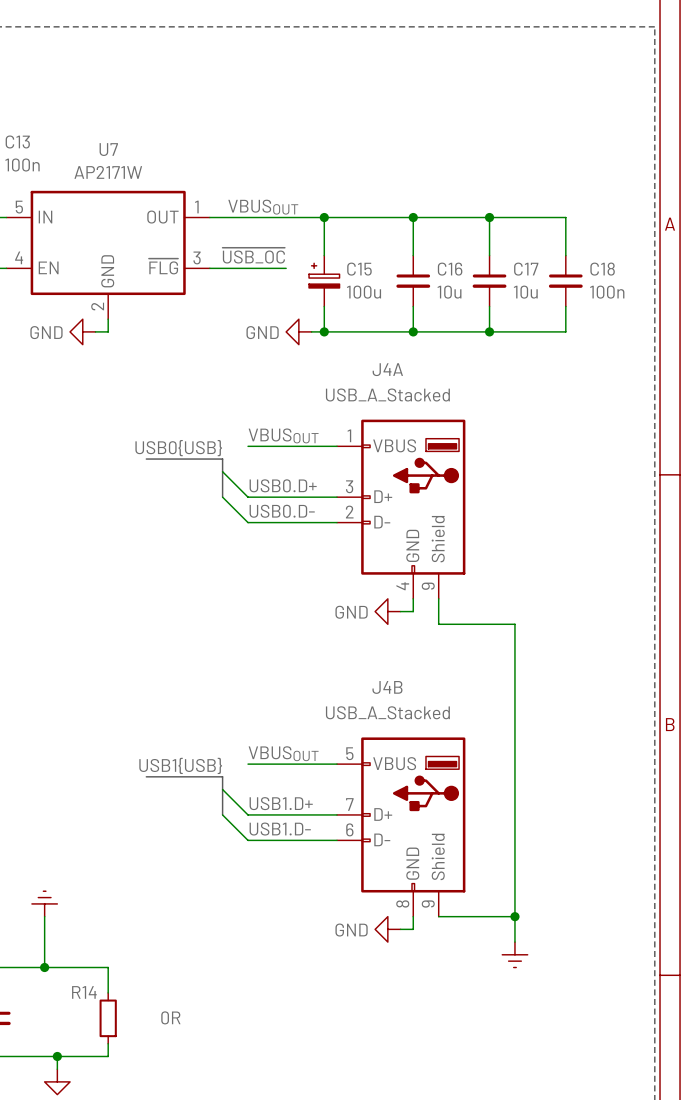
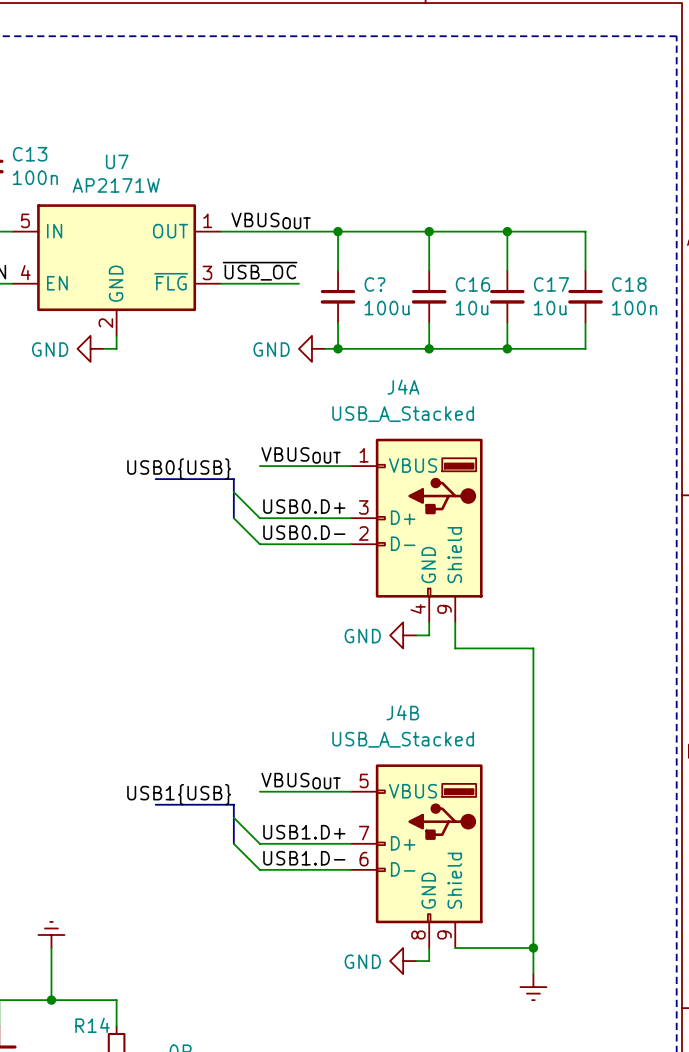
C15: 100u (324, 281) -> none
C?: none -> 100u (338, 296)

